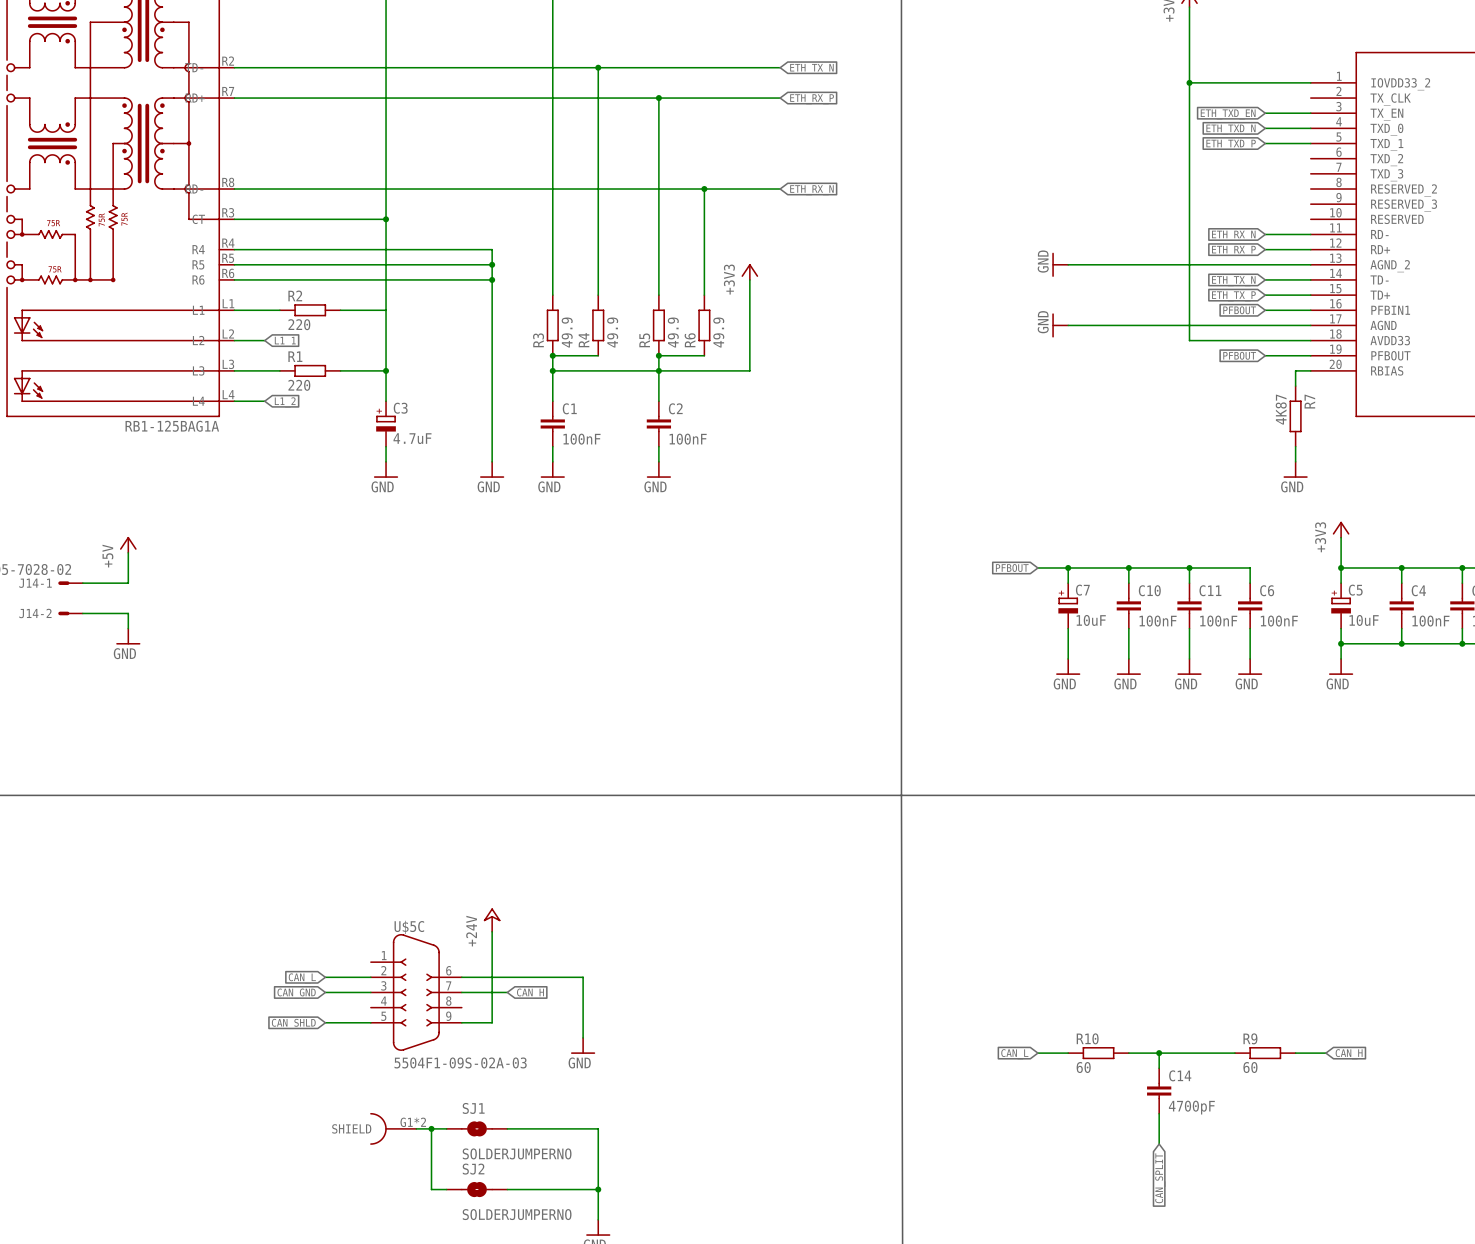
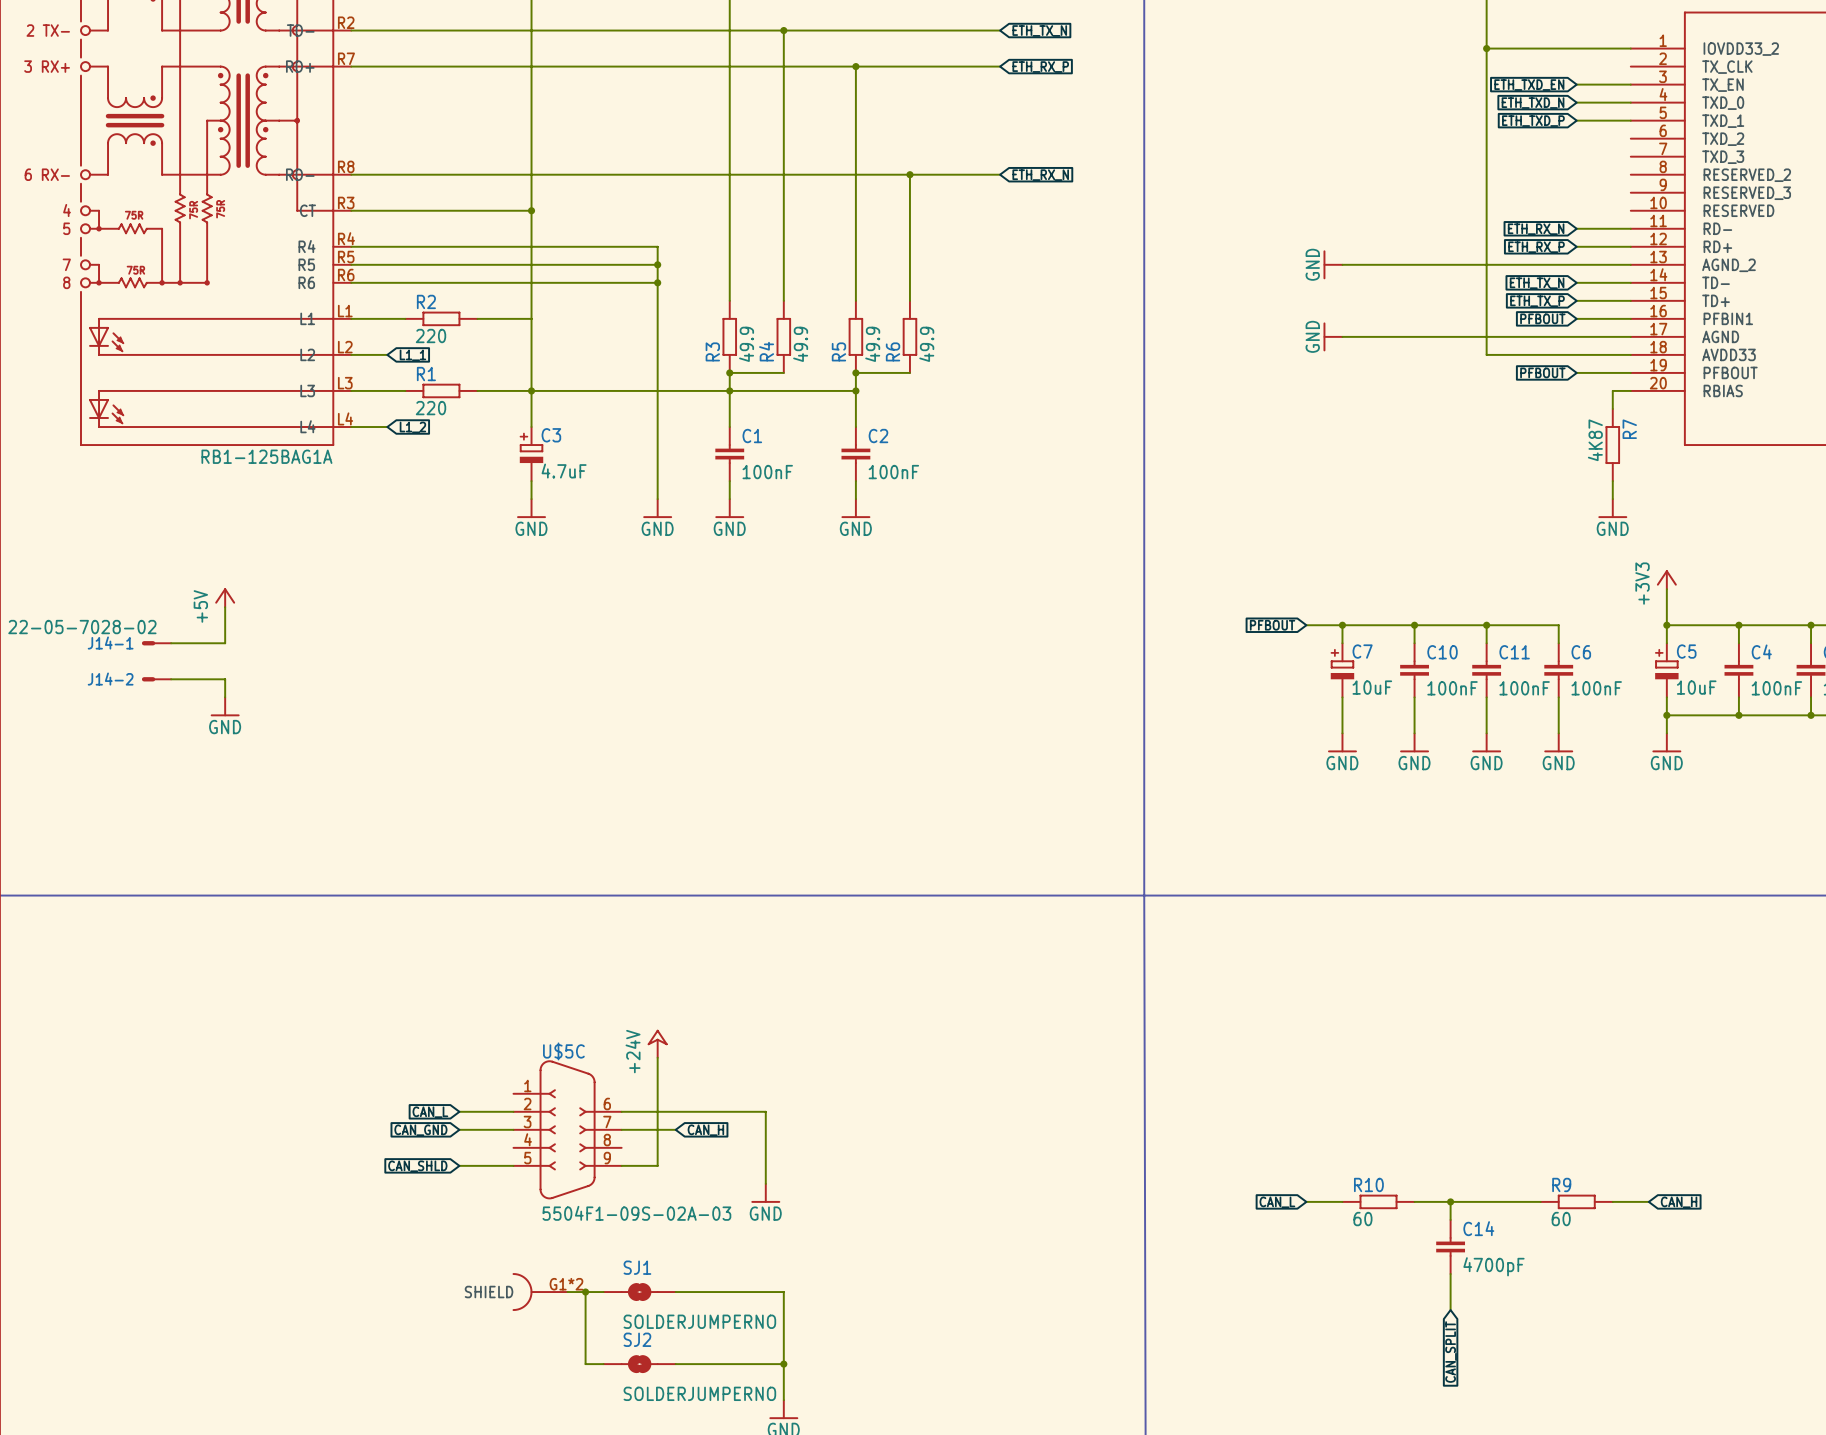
power symbol: +3V3 (749, 272) -> none
wire: (749, 279) (749, 370) (658, 370) -> none
wire: none -> (531, 390) (729, 390)

